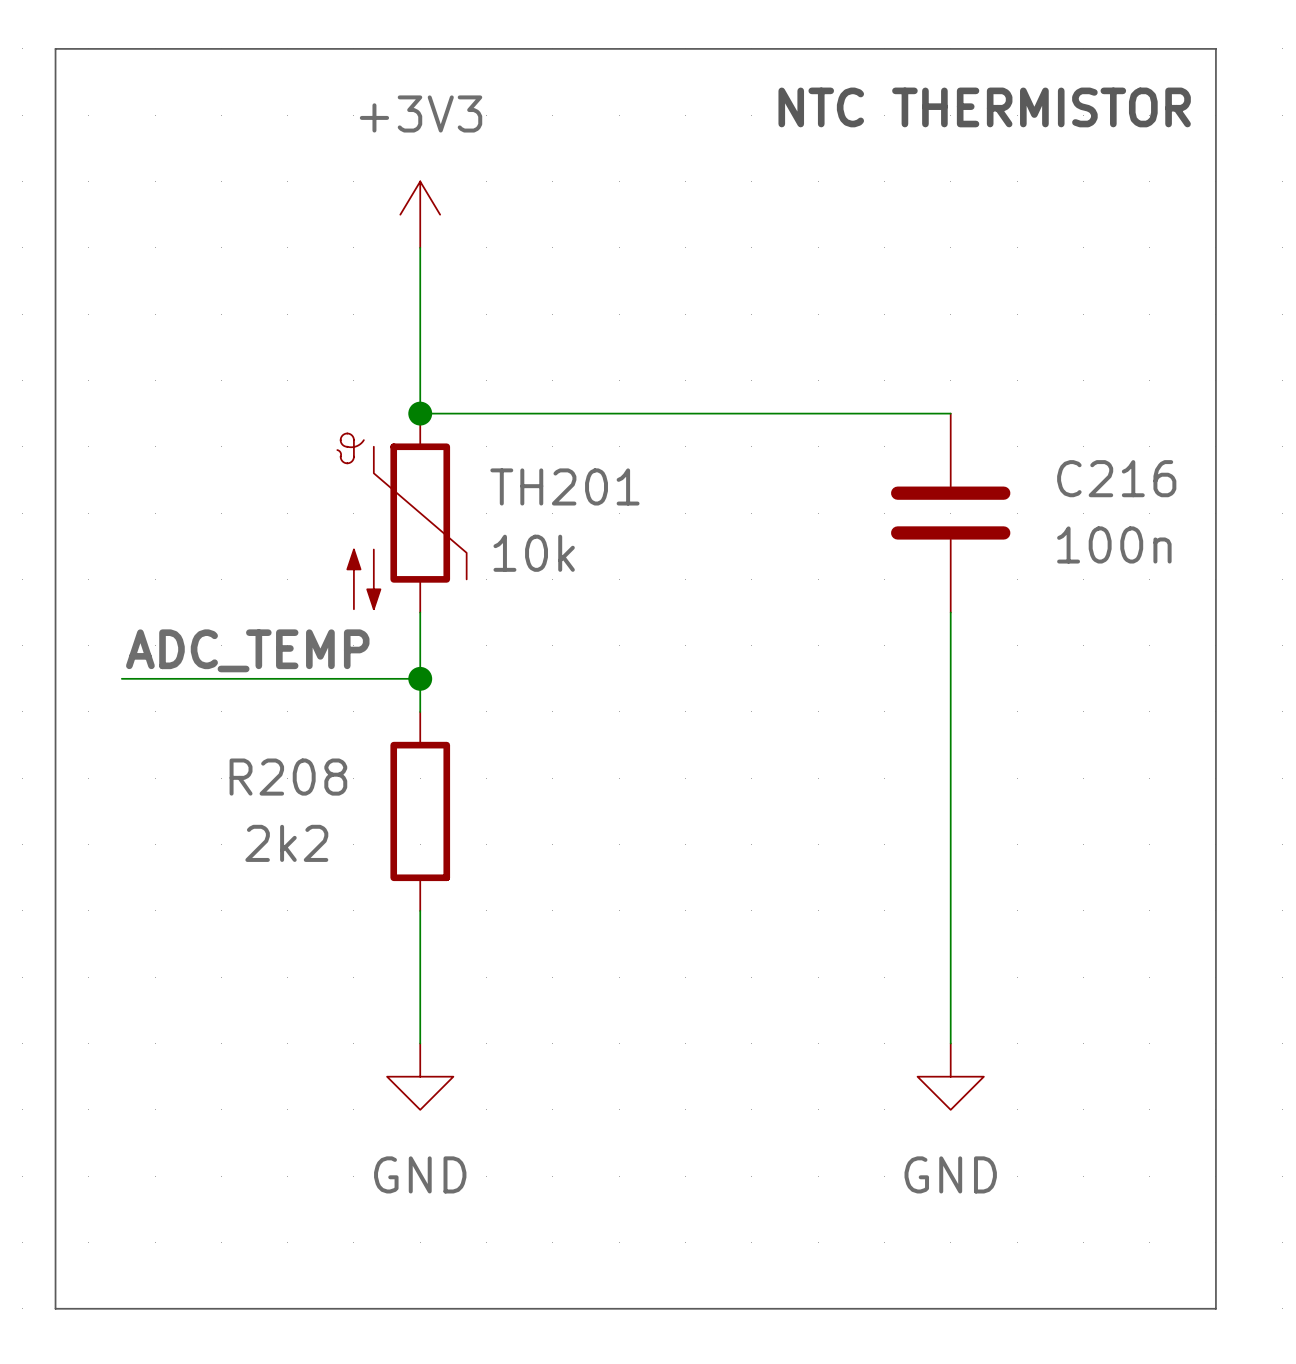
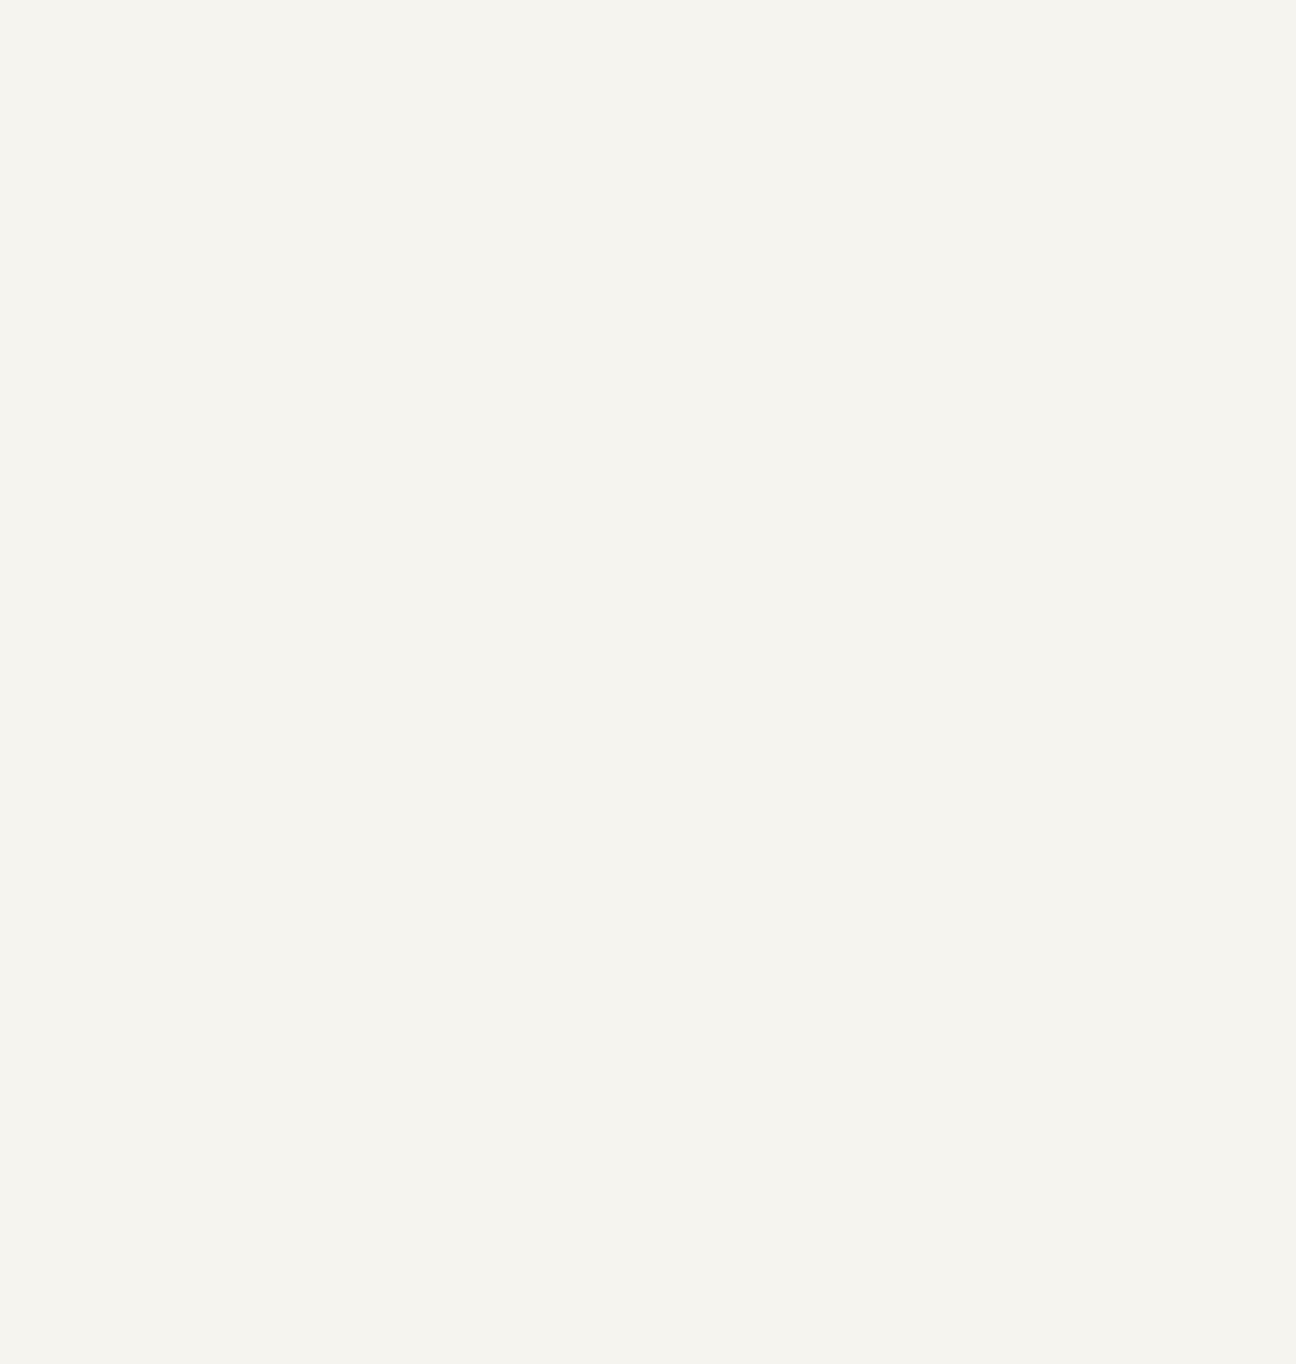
line: (55, 48) (1215, 48) (1215, 1308) (55, 1308) (55, 48) -> none
text: NTC THERMISTOR (984, 107) -> none
power symbol: +3V3 (420, 214) -> none
wire: (420, 247) (420, 413) (950, 413) -> none
junction: (420, 413) -> none
TH201: 10k (402, 513) -> none
C216: 100n (950, 513) -> none
wire: (420, 612) (420, 711) -> none
wire: (950, 612) (950, 1043) -> none
label: ADC_TEMP (247, 650) -> none
wire: (121, 678) (420, 678) -> none
junction: (420, 678) -> none
R208: 2k2 (420, 811) -> none
wire: (420, 910) (420, 1043) -> none
power symbol: GND (420, 1076) -> none
power symbol: GND (950, 1076) -> none

